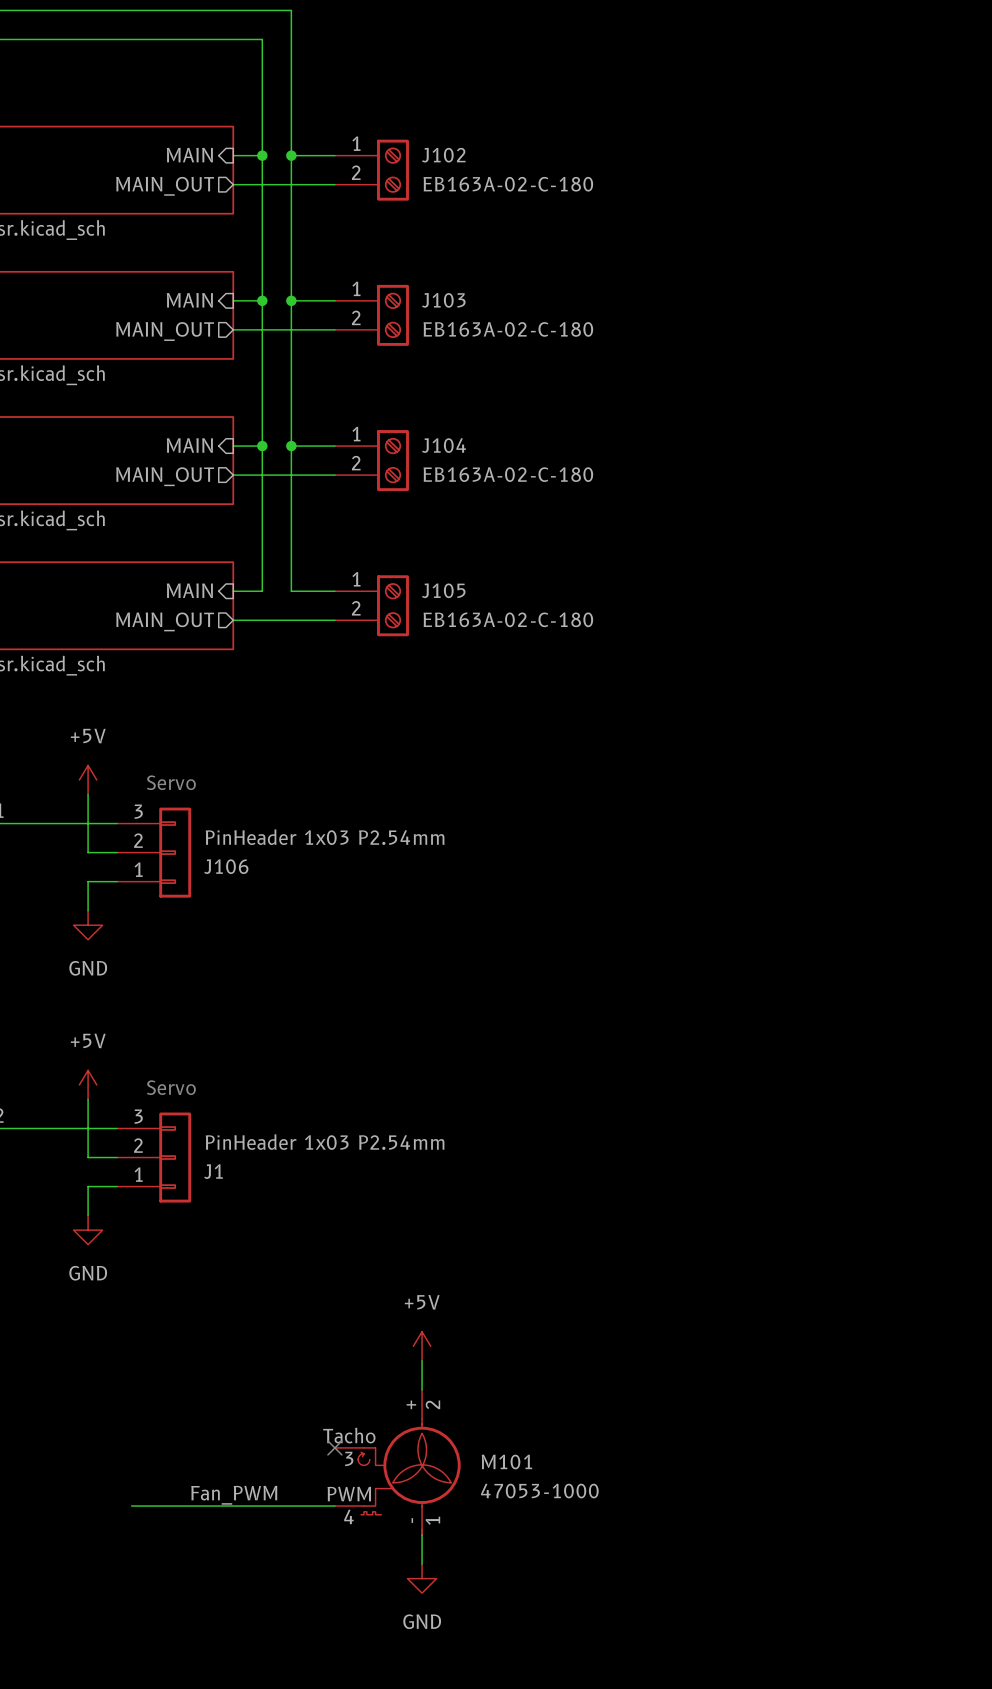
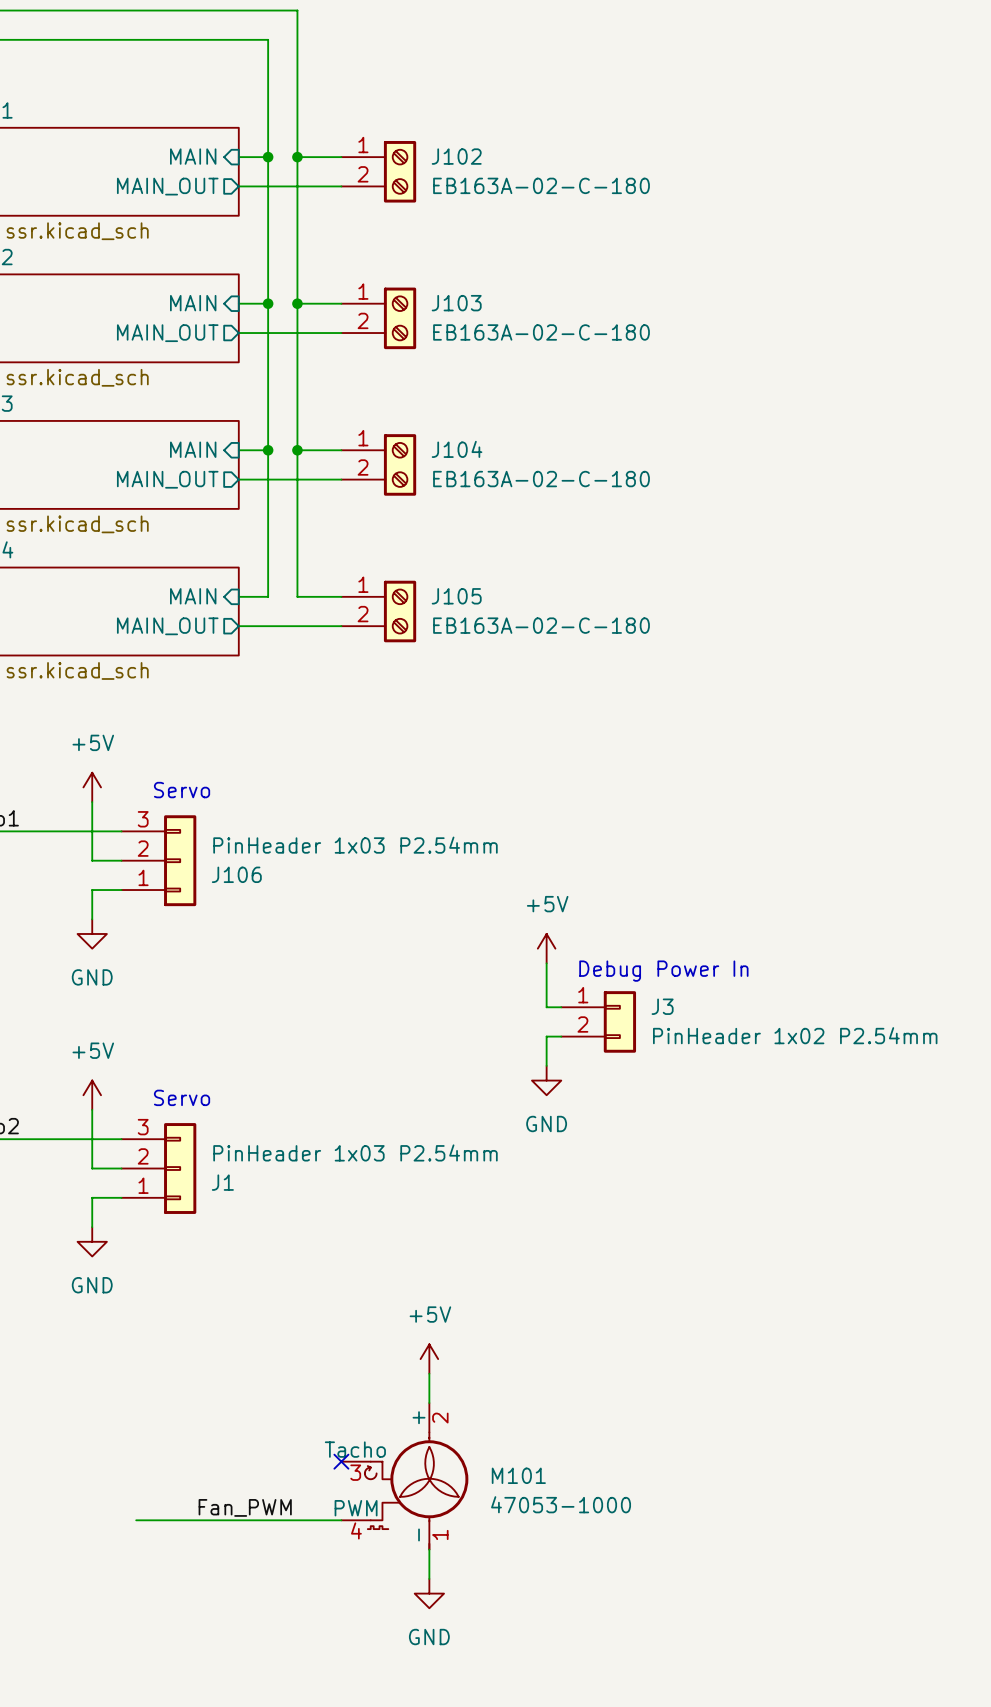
power symbol: none -> +5V (546, 948)
wire: none -> (546, 963) (546, 1007) (561, 1007)
text: none -> Debug Power In (663, 971)
J3: none -> PinHeader 1x02 P2.54mm (598, 1021)
wire: none -> (561, 1036) (546, 1036) (546, 1065)
power symbol: none -> GND (546, 1080)

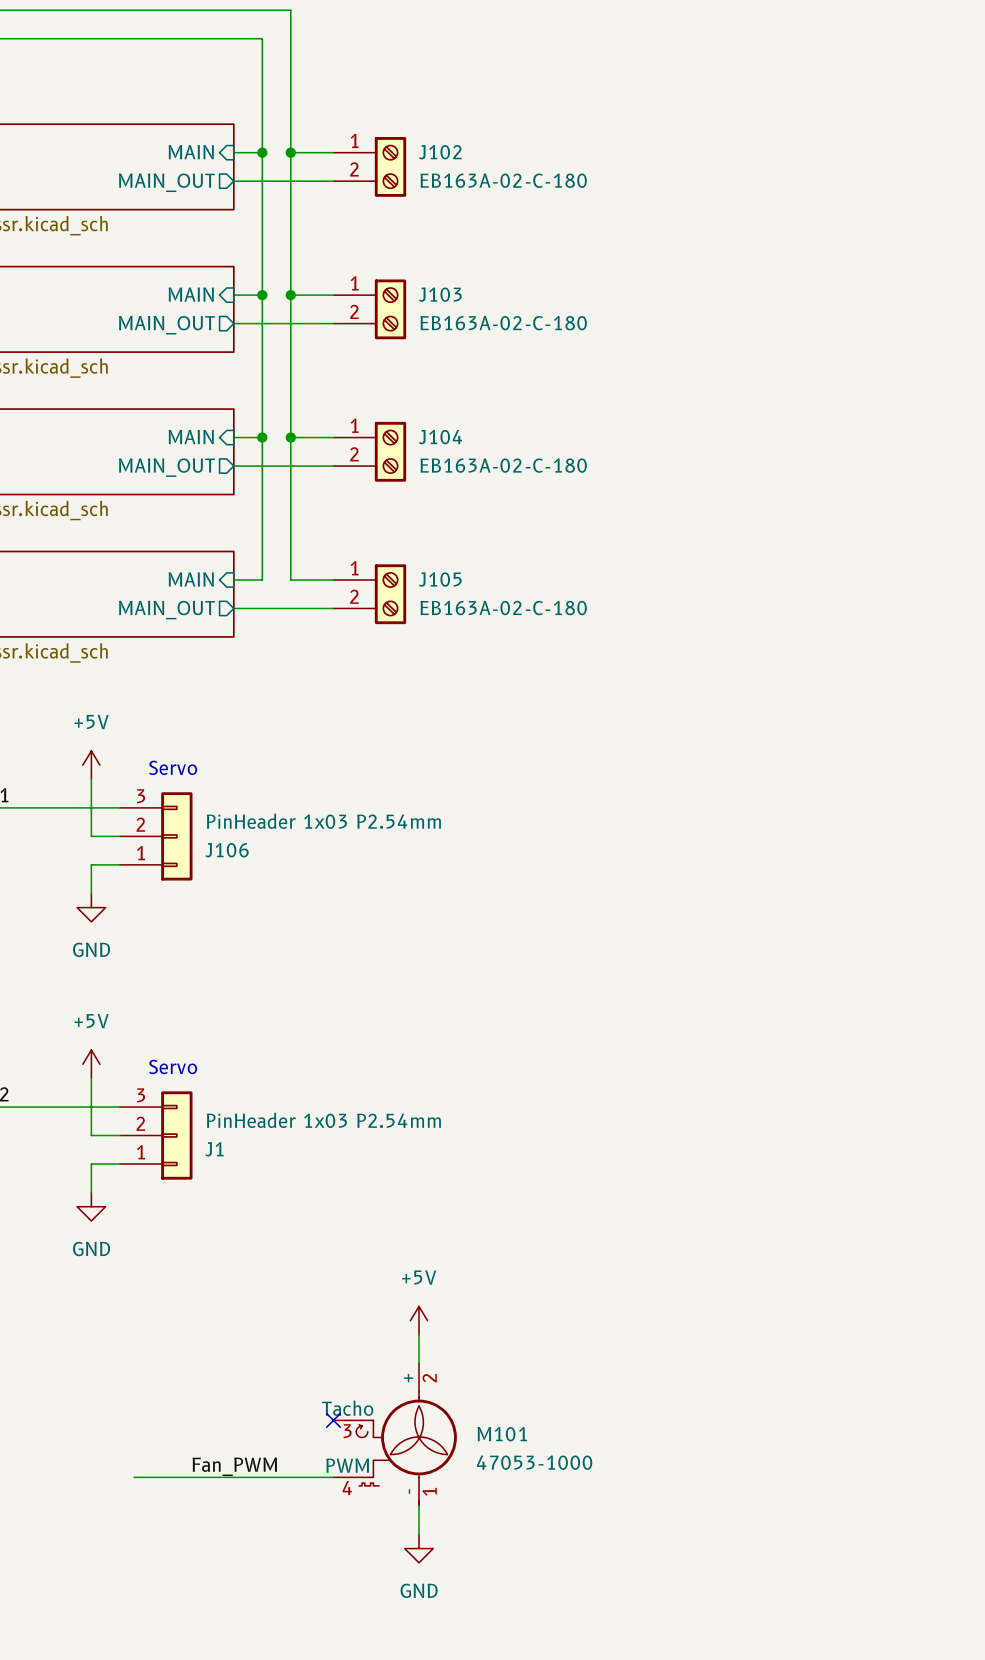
power symbol: +5V (546, 948) -> none
wire: (546, 963) (546, 1007) (561, 1007) -> none
text: Debug Power In (663, 971) -> none
J3: PinHeader 1x02 P2.54mm (598, 1021) -> none
wire: (561, 1036) (546, 1036) (546, 1065) -> none
power symbol: GND (546, 1080) -> none

